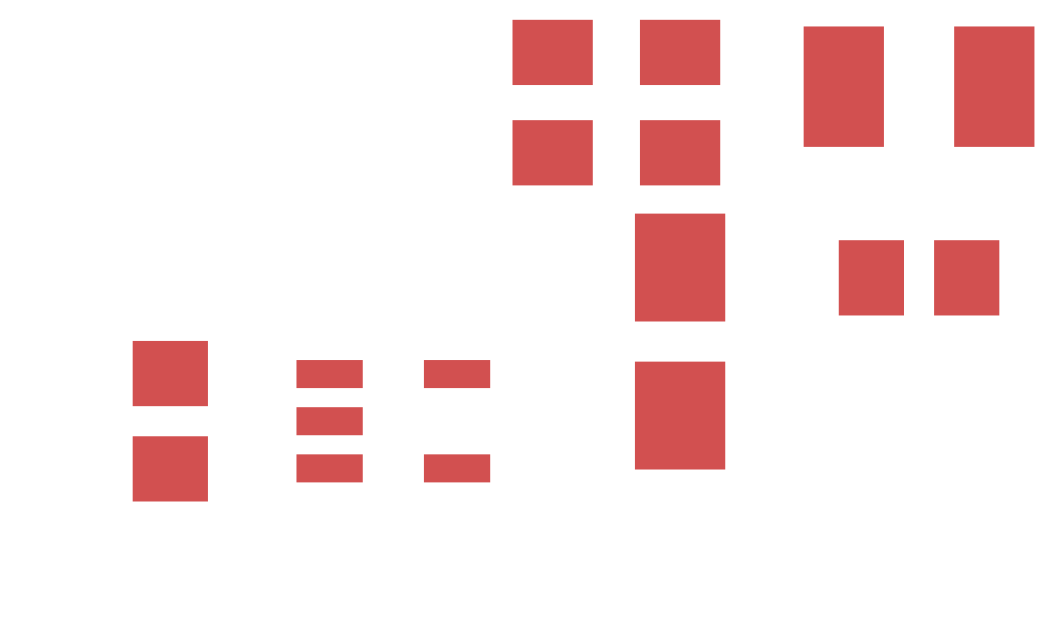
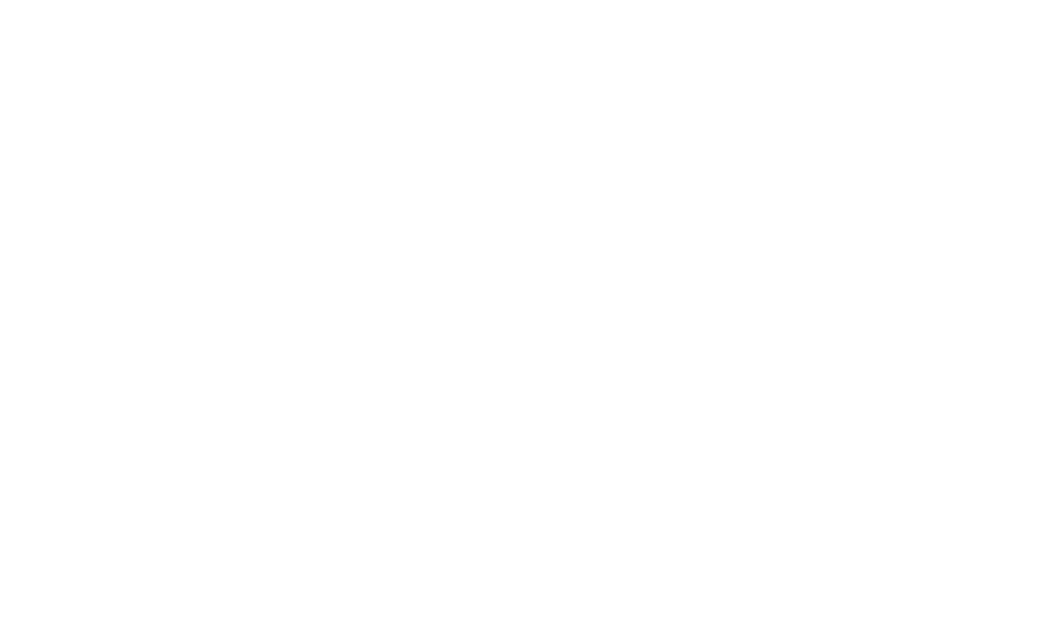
part: (919, 86) -> none
part: (552, 102) -> none
part: (680, 102) -> none
part: (919, 277) -> none
part: (680, 341) -> none
part: (170, 421) -> none
part: (393, 421) -> none

